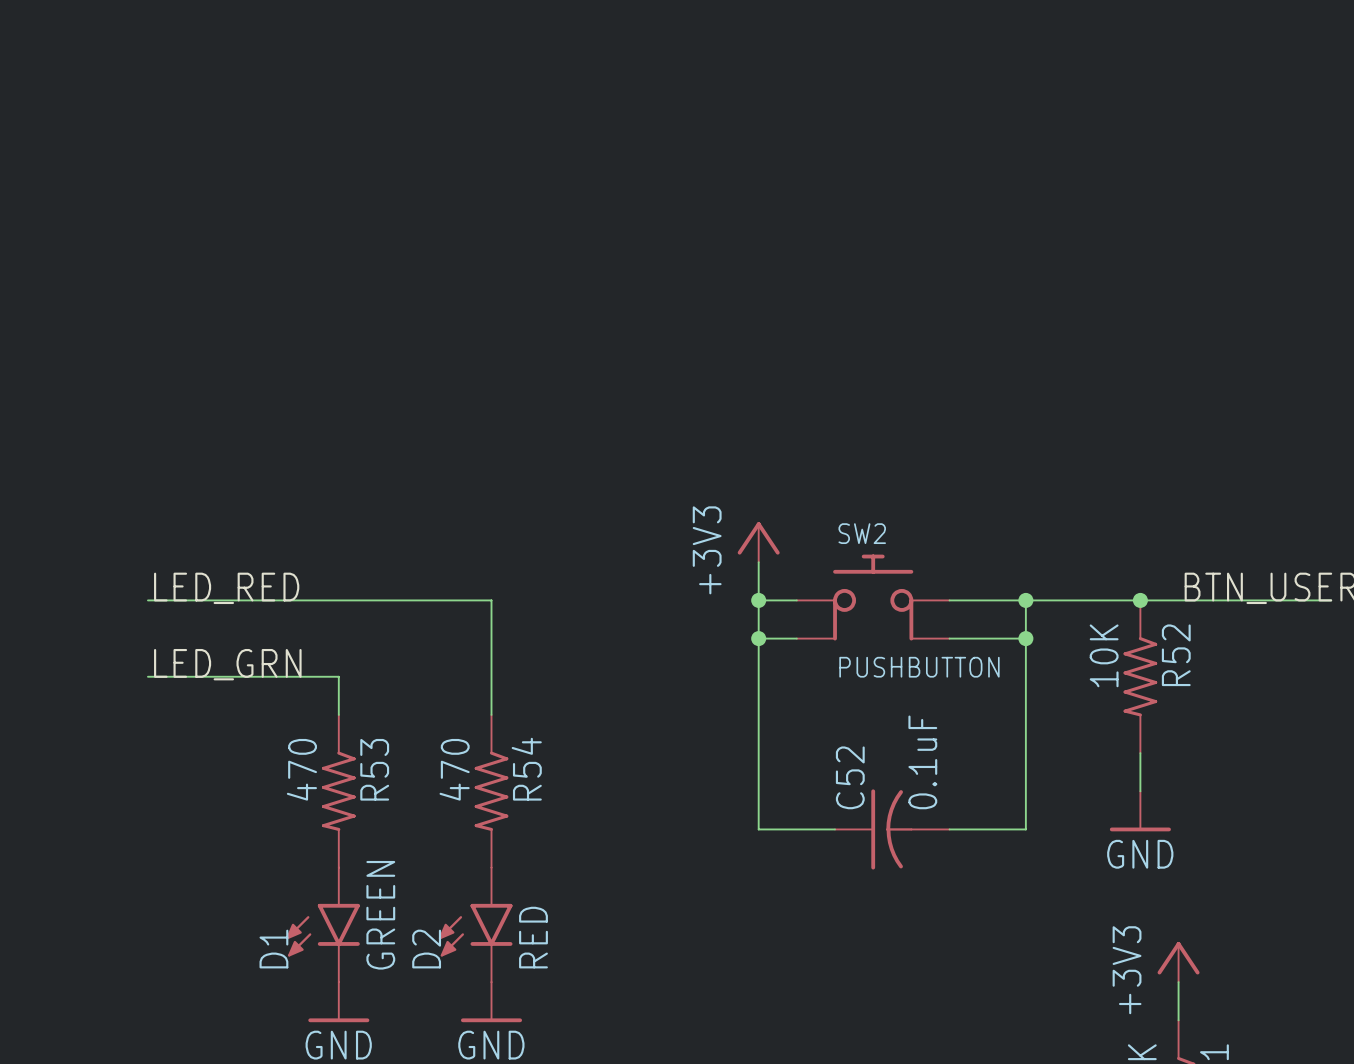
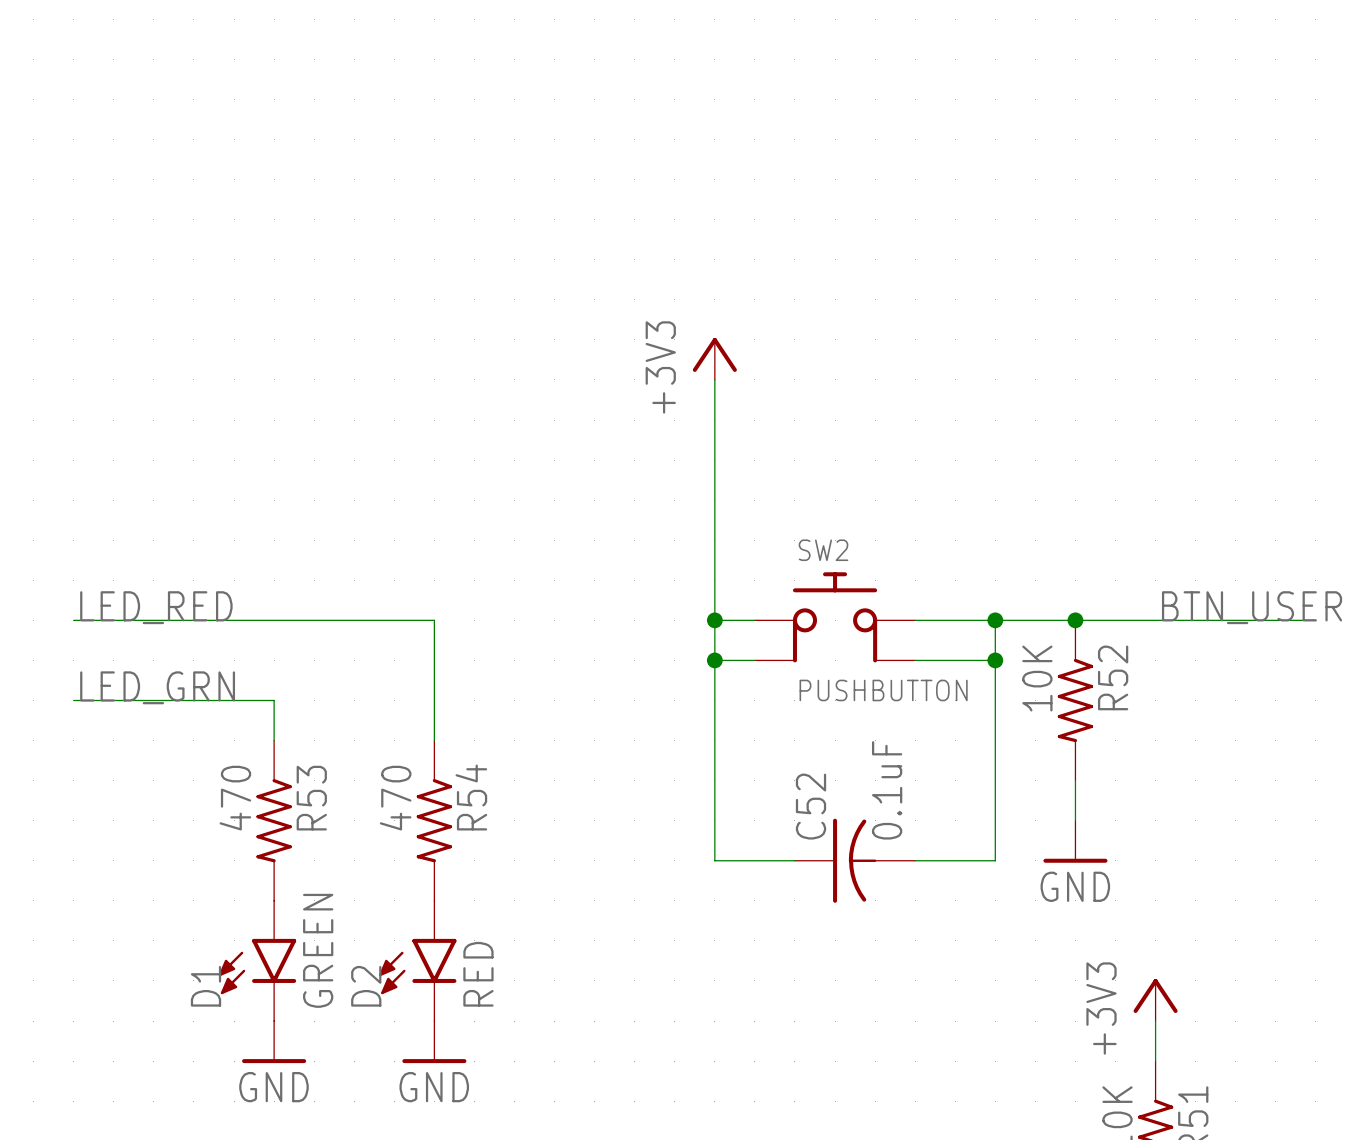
wire: none -> (714, 379) (714, 580)
power symbol position: +3V3 (758, 542) -> +3V3 (714, 358)
junction position: (1140, 600) -> (1075, 620)
R52 position: (1140, 676) -> (1075, 700)
wire: (1140, 753) (1140, 791) -> (1075, 780) (1075, 820)
power symbol position: GND (1140, 811) -> GND (1075, 841)

